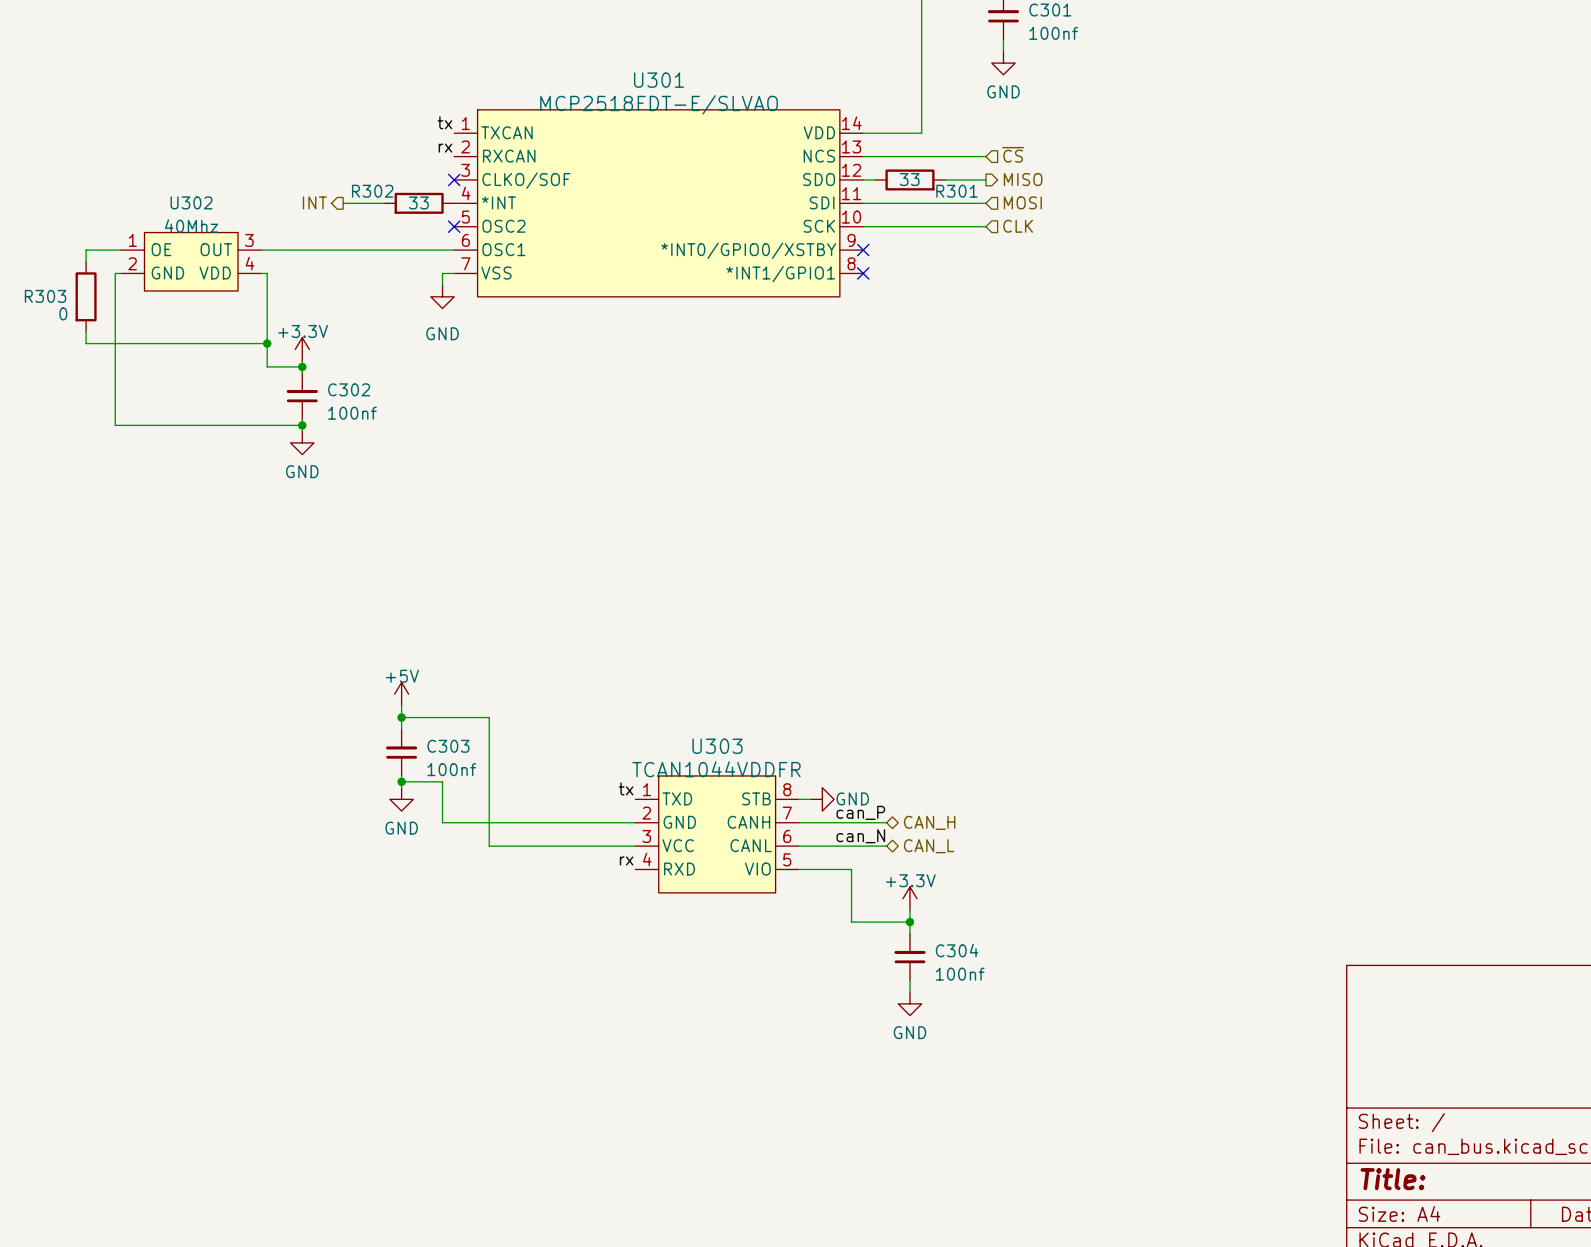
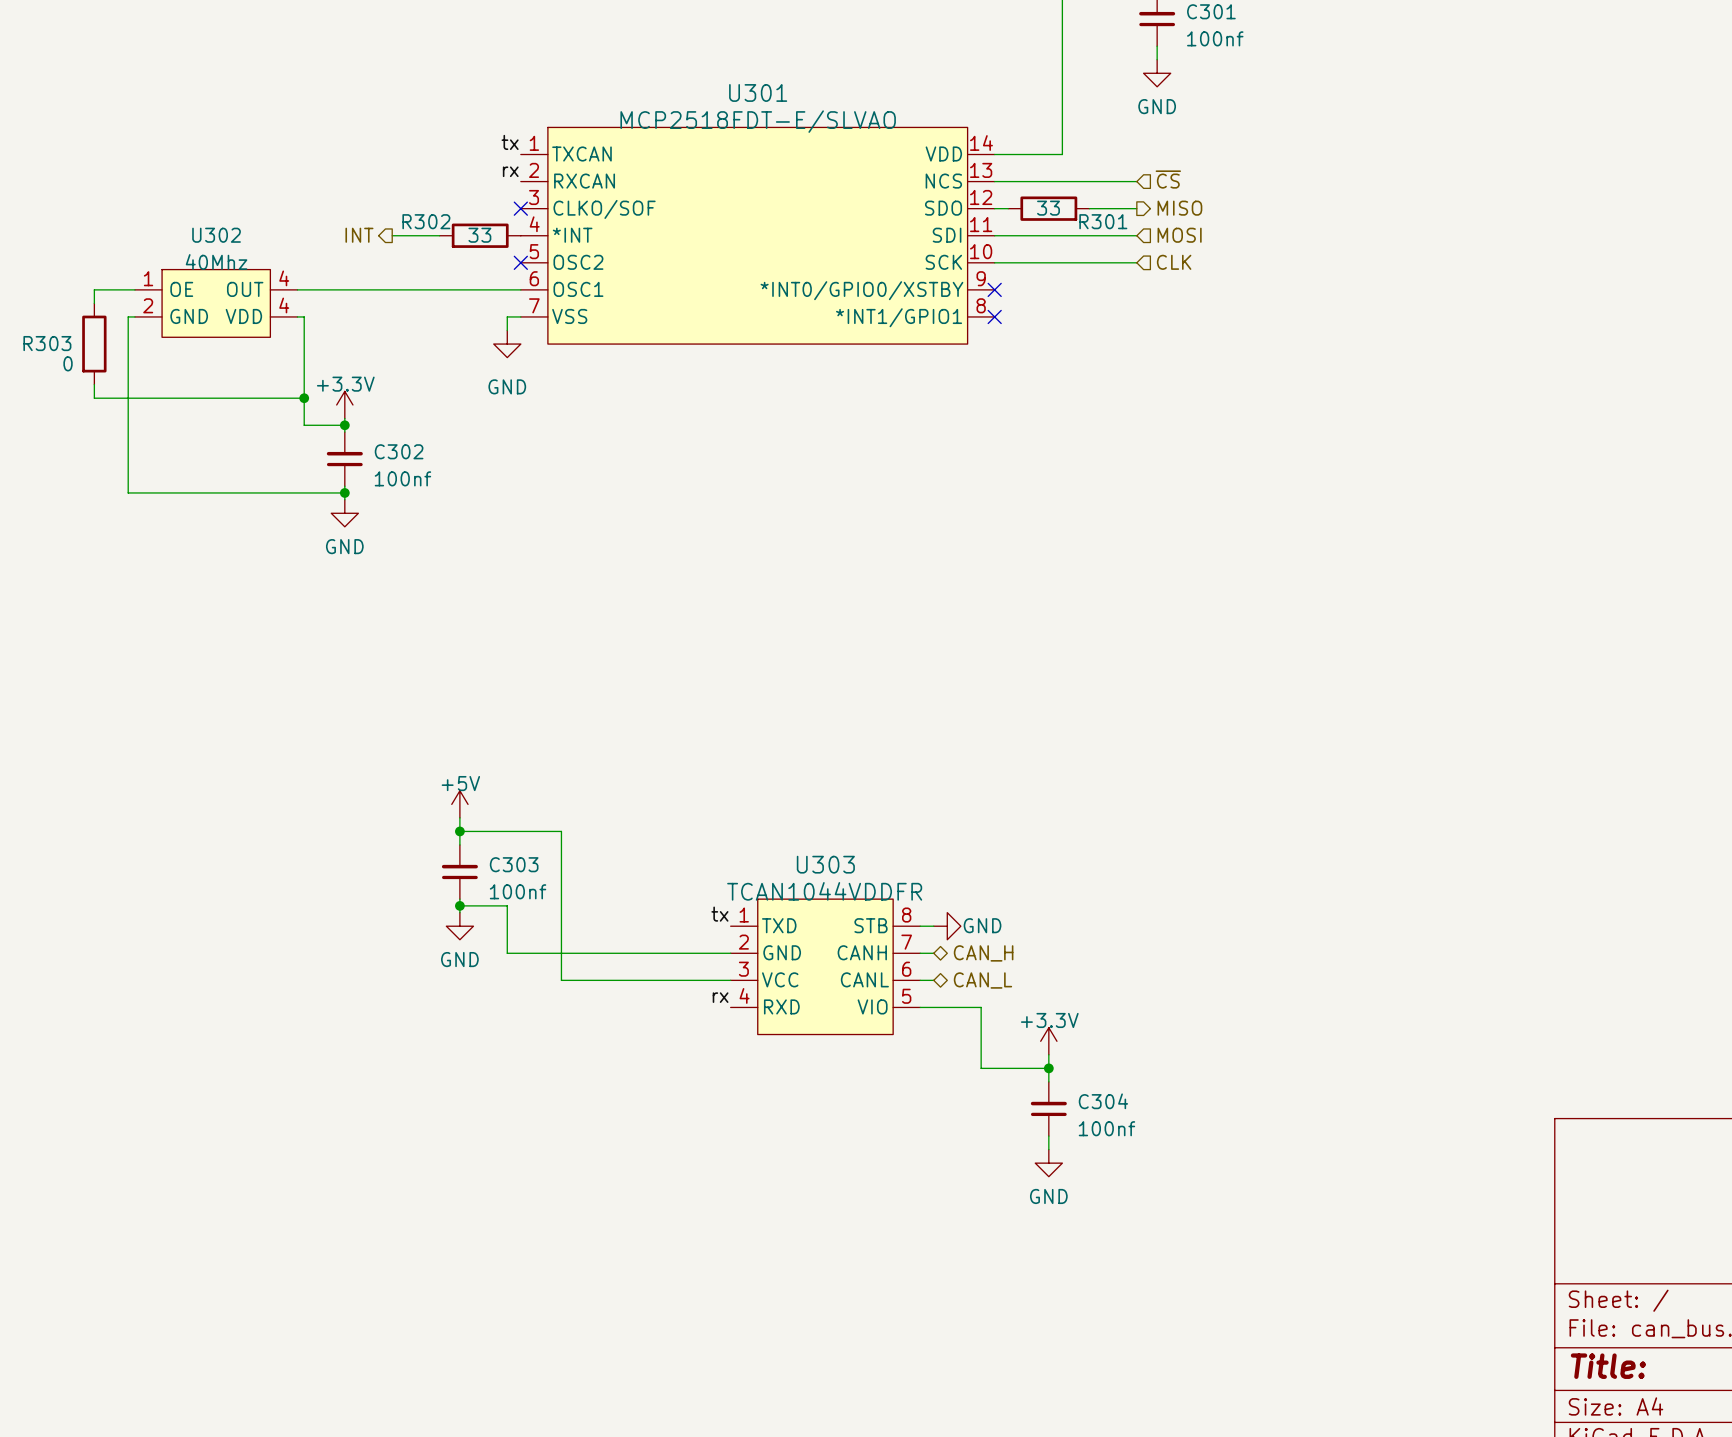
U302 pin number: 3 (249, 240) -> 4 (284, 278)
label: can_P (860, 812) -> none
wire: (810, 822) (886, 822) -> none
hierarchical label position: CAN_H (929, 822) -> CAN_H (983, 953)
label: can_N (860, 836) -> none
wire: (810, 846) (886, 846) -> none
hierarchical label position: CAN_L (929, 846) -> CAN_L (982, 980)

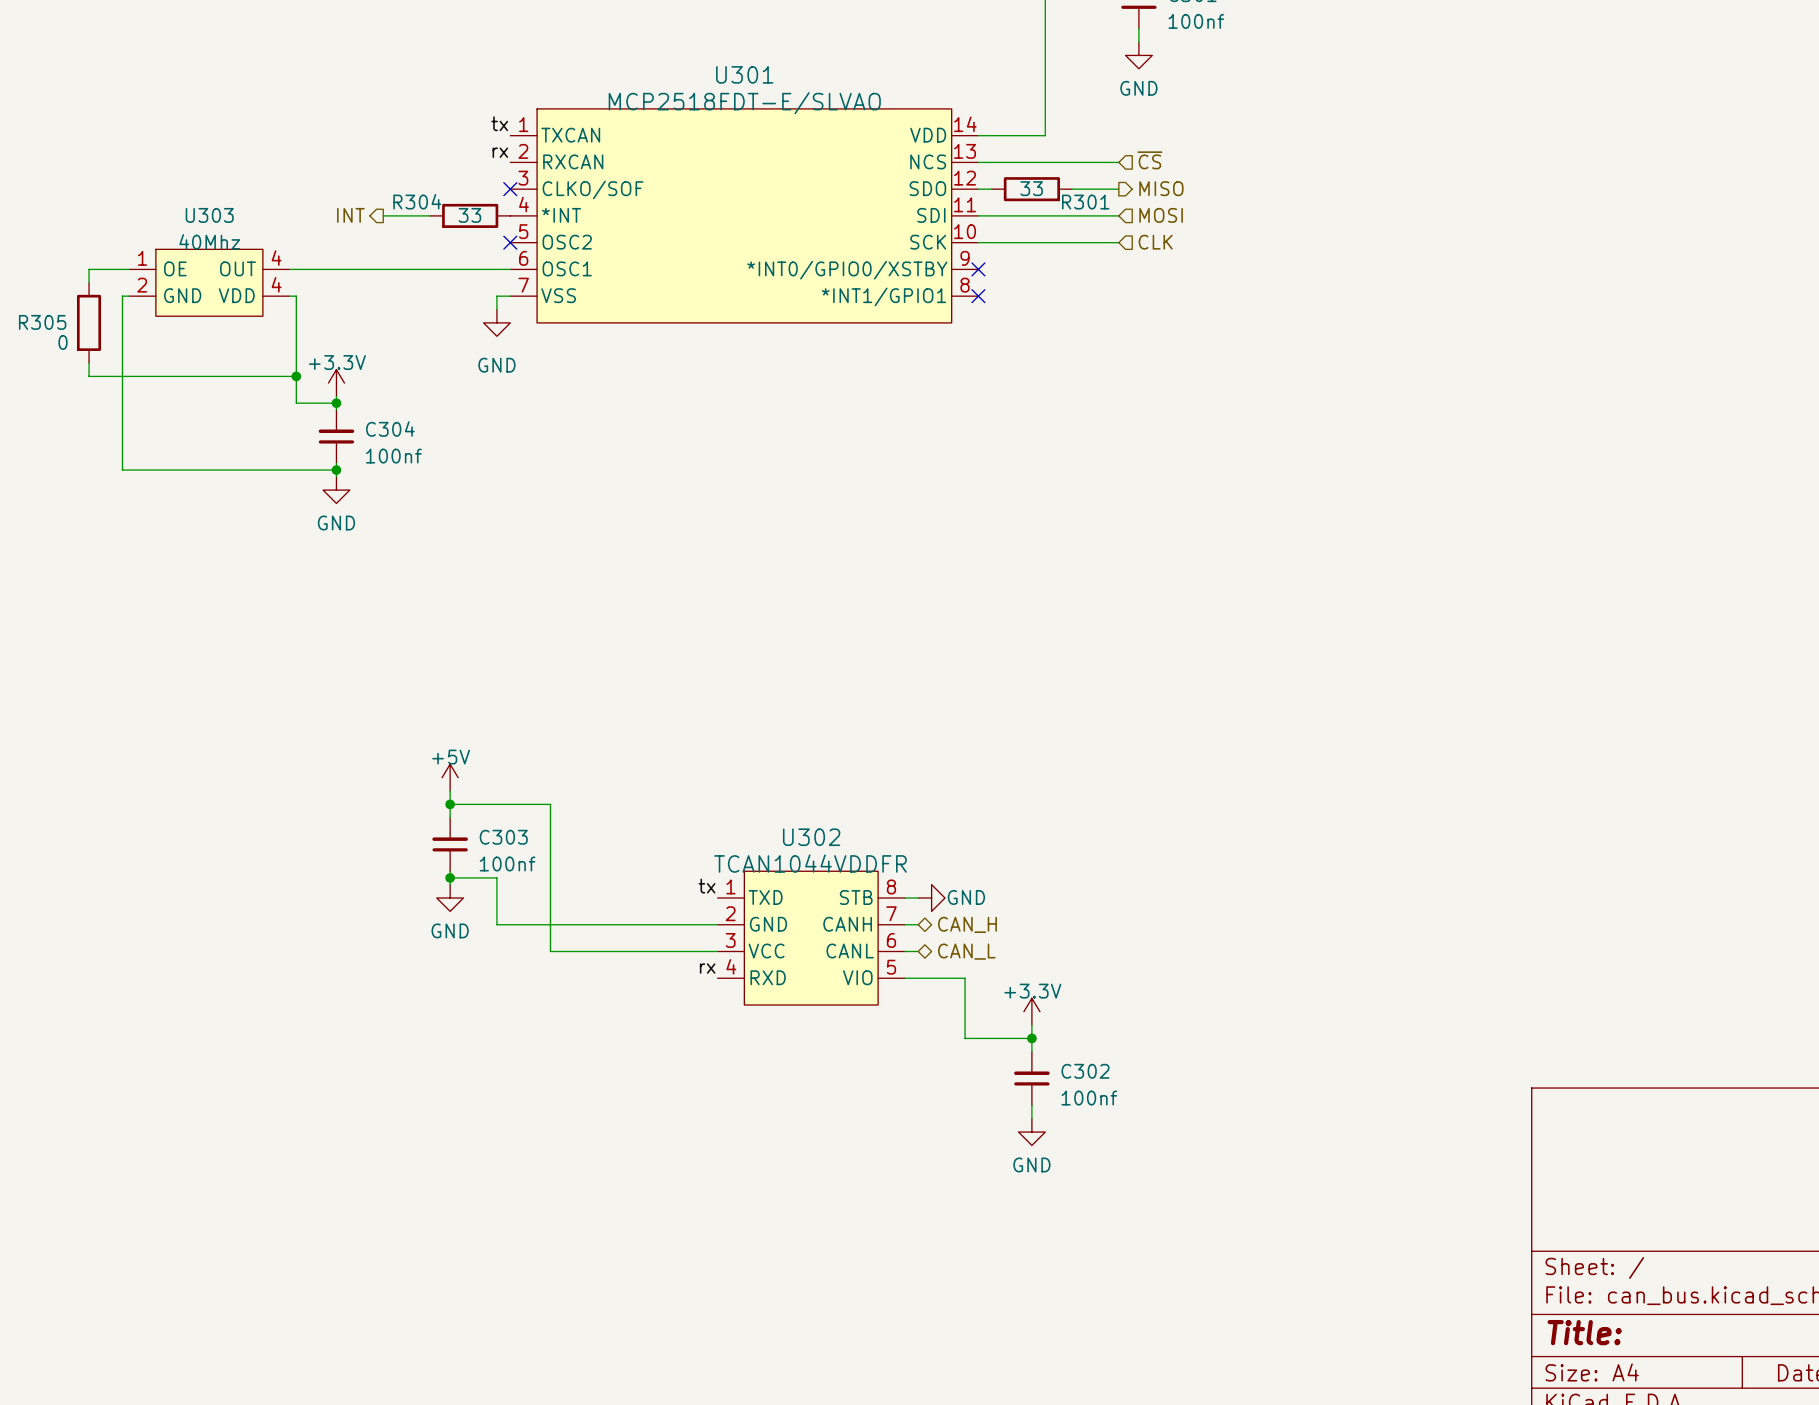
R302 name: R302 (426, 221) -> R304 (417, 201)
U302 name: U302 (216, 235) -> U303 (209, 215)
R303 name: R303 (47, 343) -> R305 (42, 322)
C302 name: C302 (399, 451) -> C304 (390, 429)
U303 name: U303 (825, 864) -> U302 (811, 837)
C304 name: C304 (1103, 1101) -> C302 (1085, 1071)

